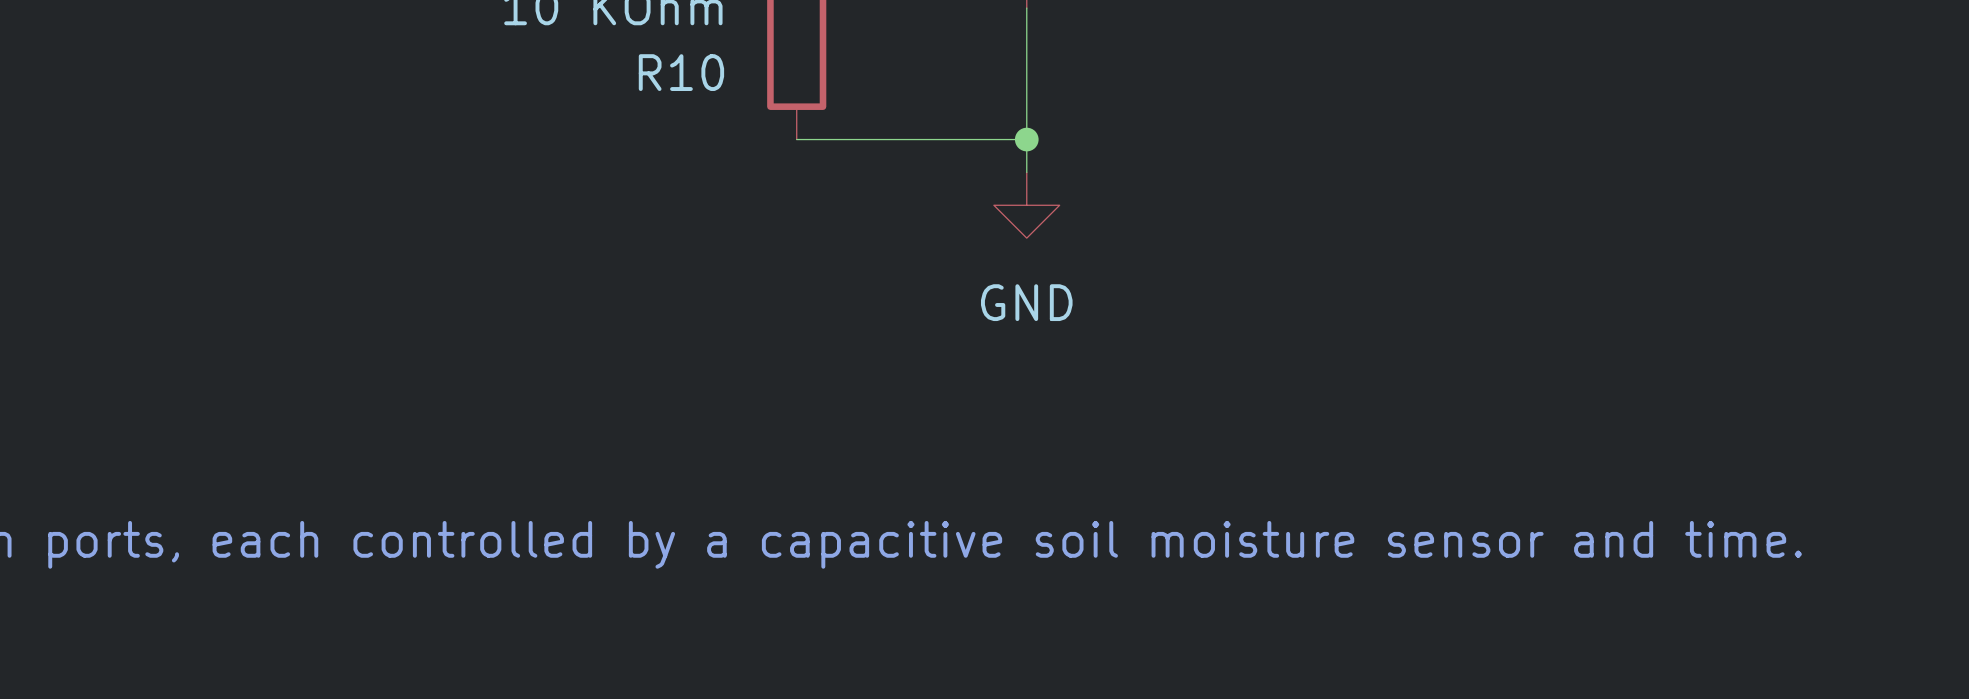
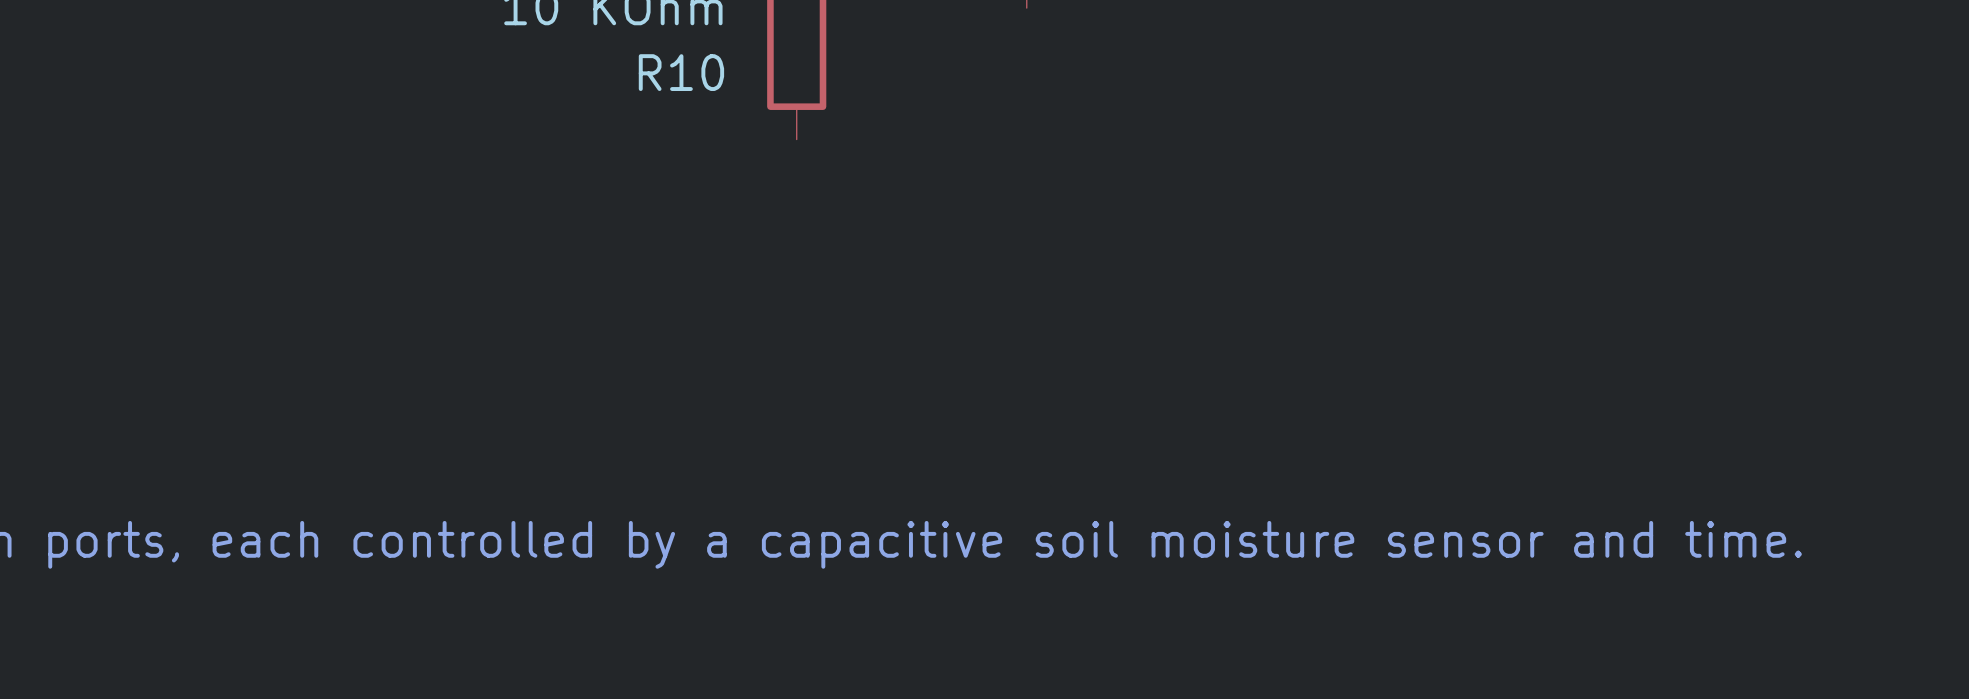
wire: (1026, 8) (1026, 172) -> none
wire: (796, 139) (1026, 139) -> none
junction: (1026, 139) -> none
power symbol: GND (1026, 205) -> none

